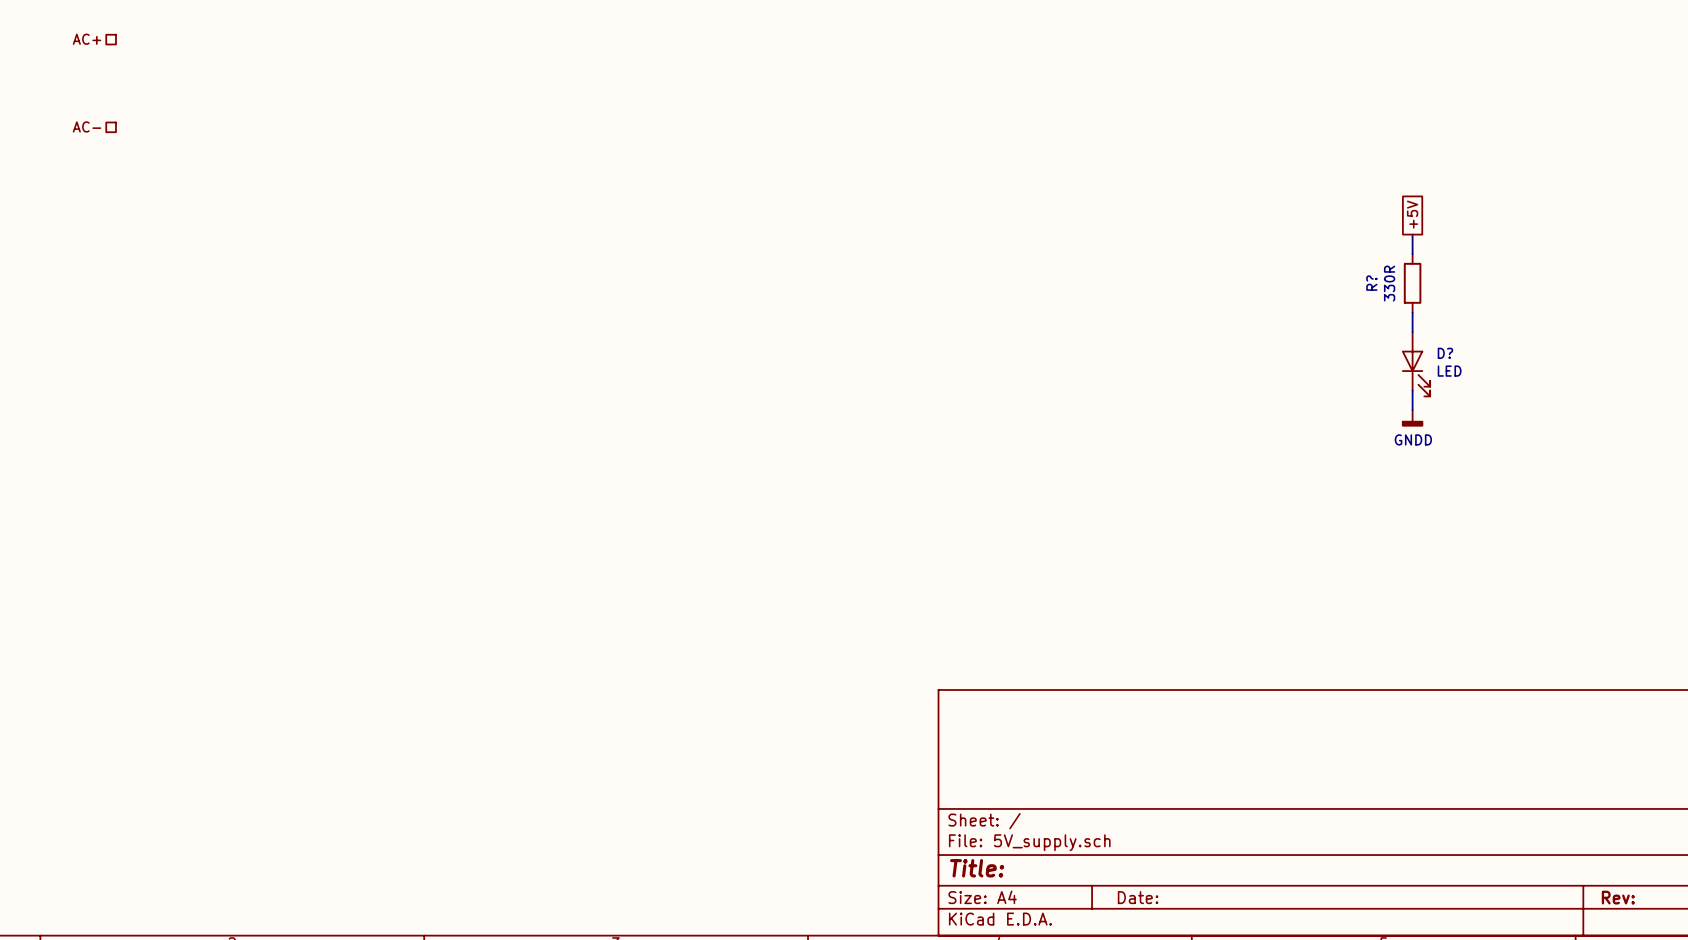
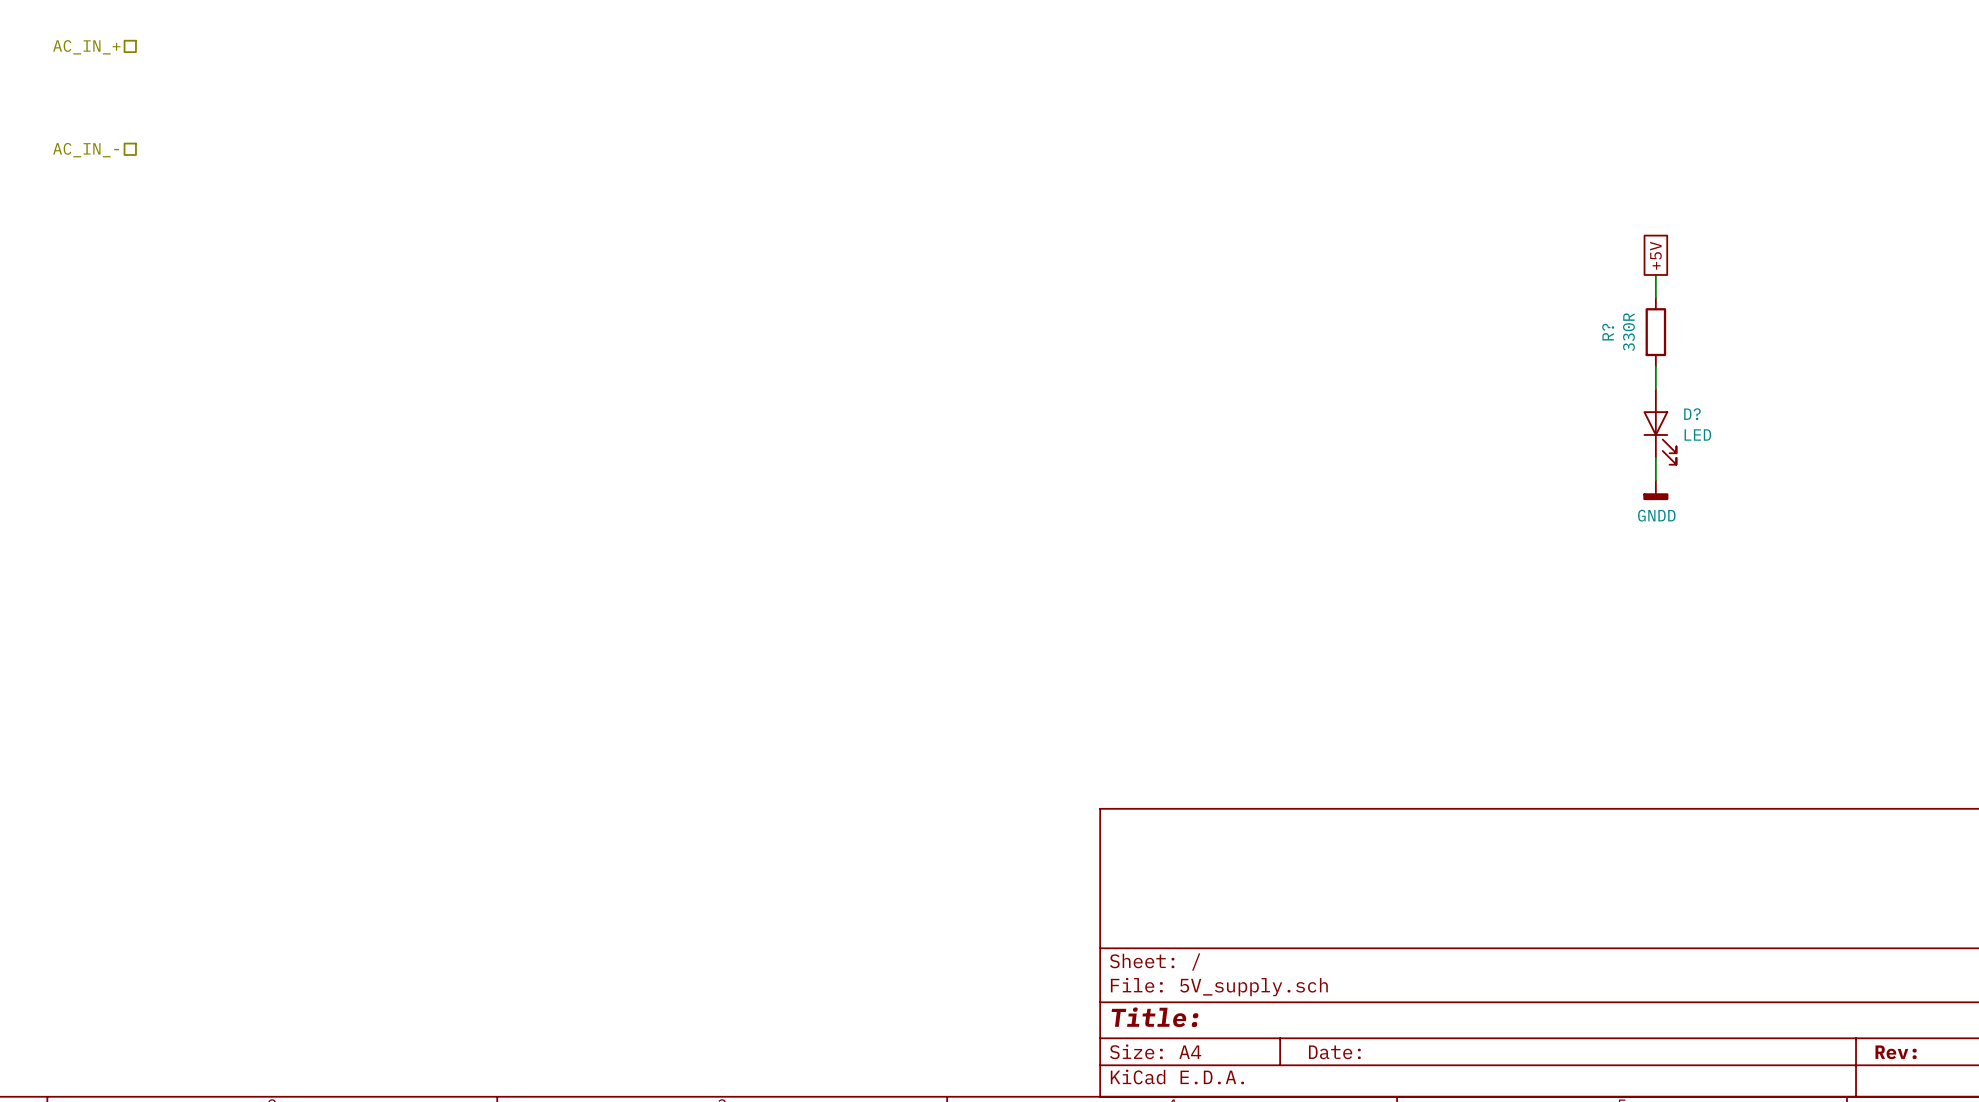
hierarchical label: AC+ (87, 39) -> AC_IN_+ (86, 47)
hierarchical label: AC- (87, 126) -> AC_IN_- (86, 150)

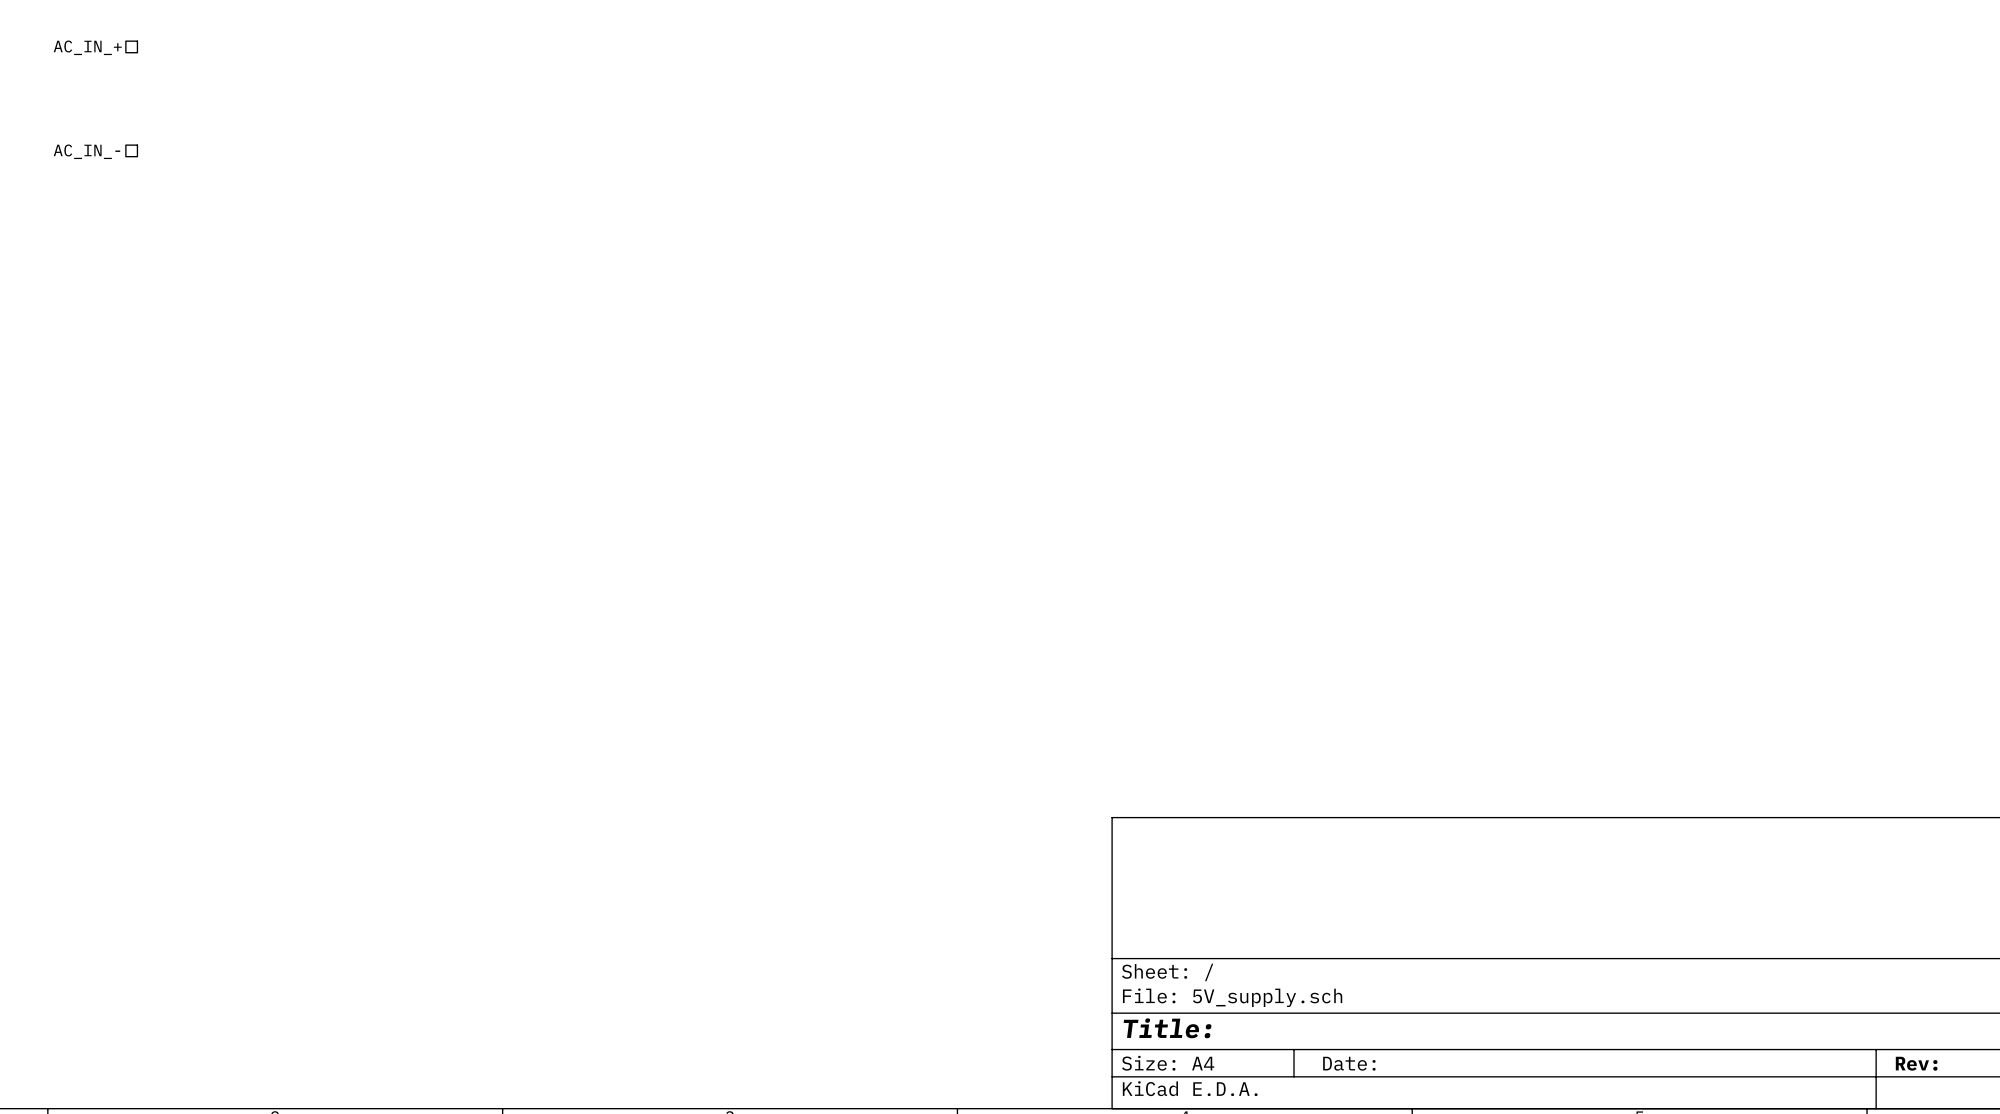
global label: +5V (1655, 255) -> none
wire: (1655, 274) (1655, 297) -> none
R?: 330R (1655, 332) -> none
wire: (1655, 366) (1655, 389) -> none
D?: LED (1659, 426) -> none
wire: (1655, 457) (1655, 480) -> none
power symbol: GNDD (1655, 490) -> none

